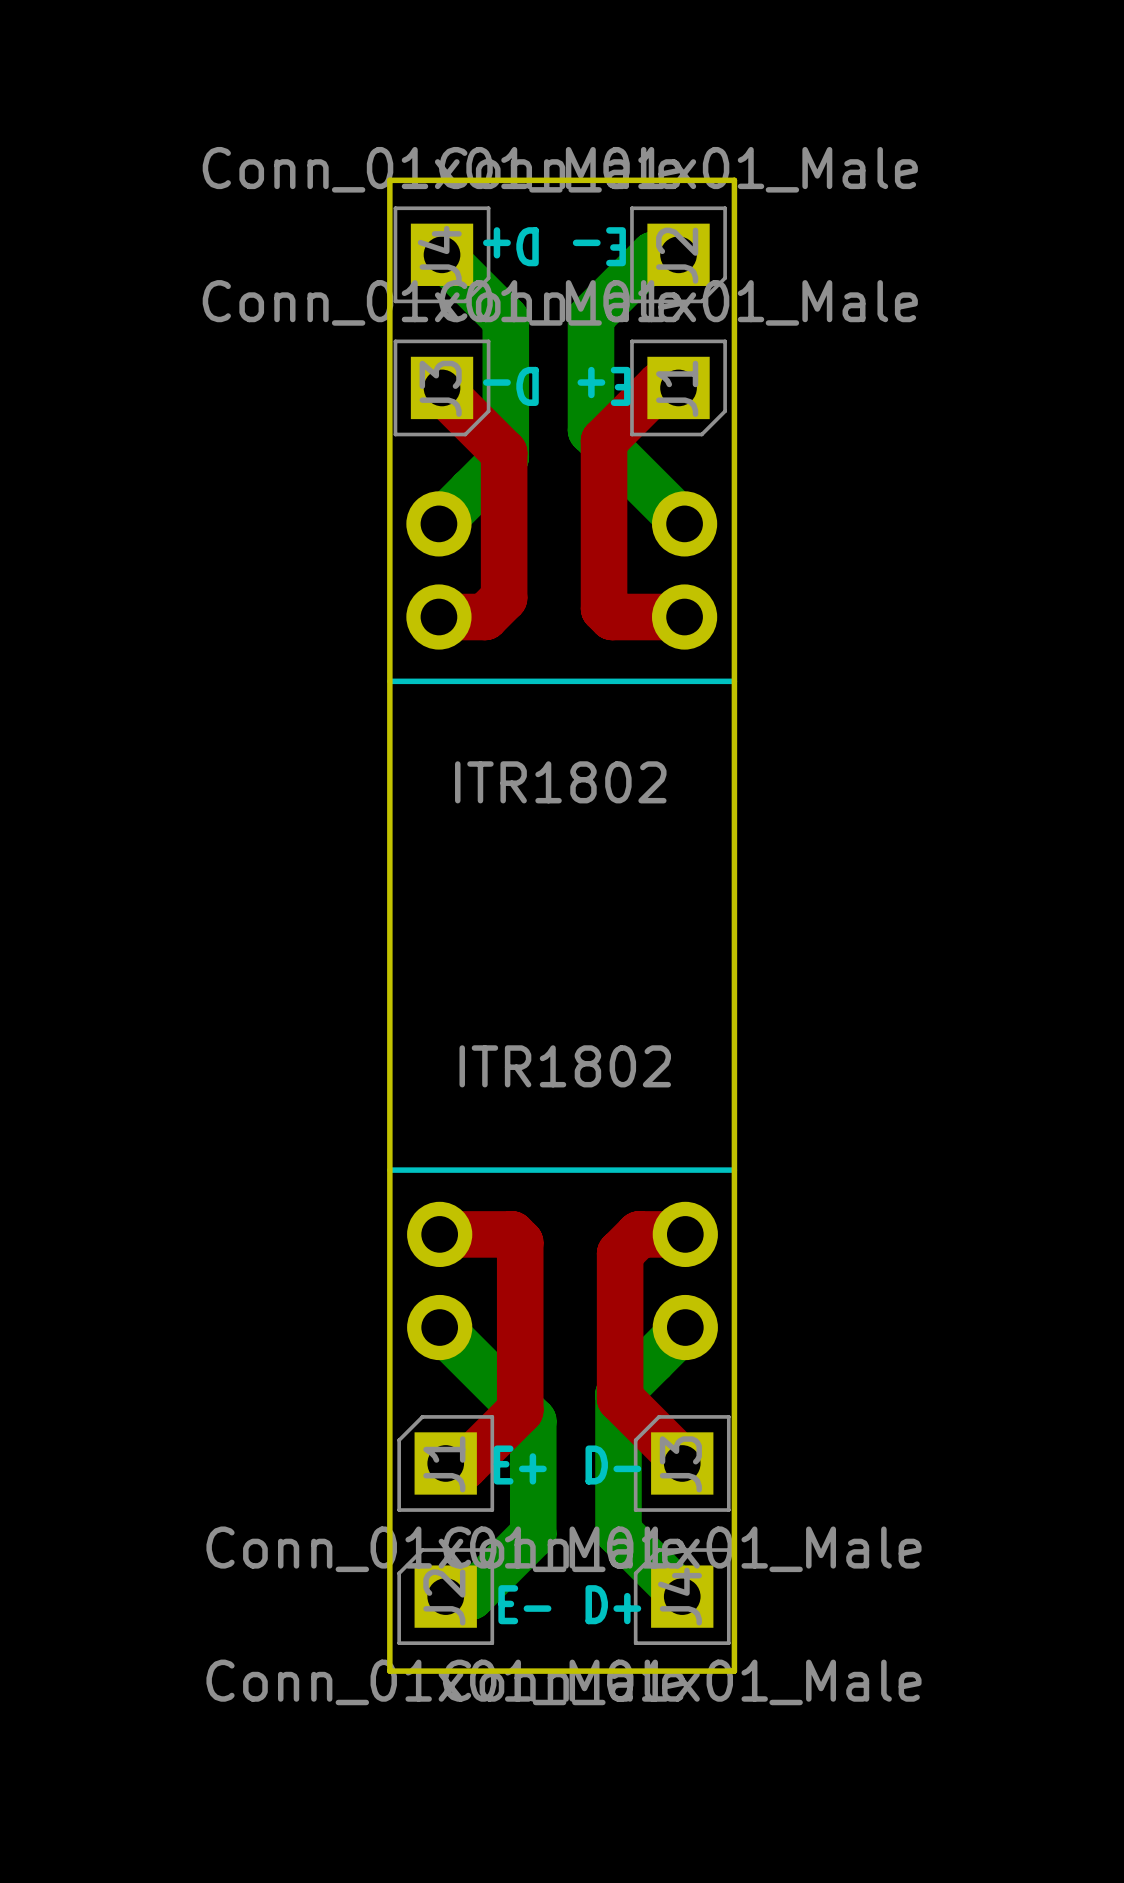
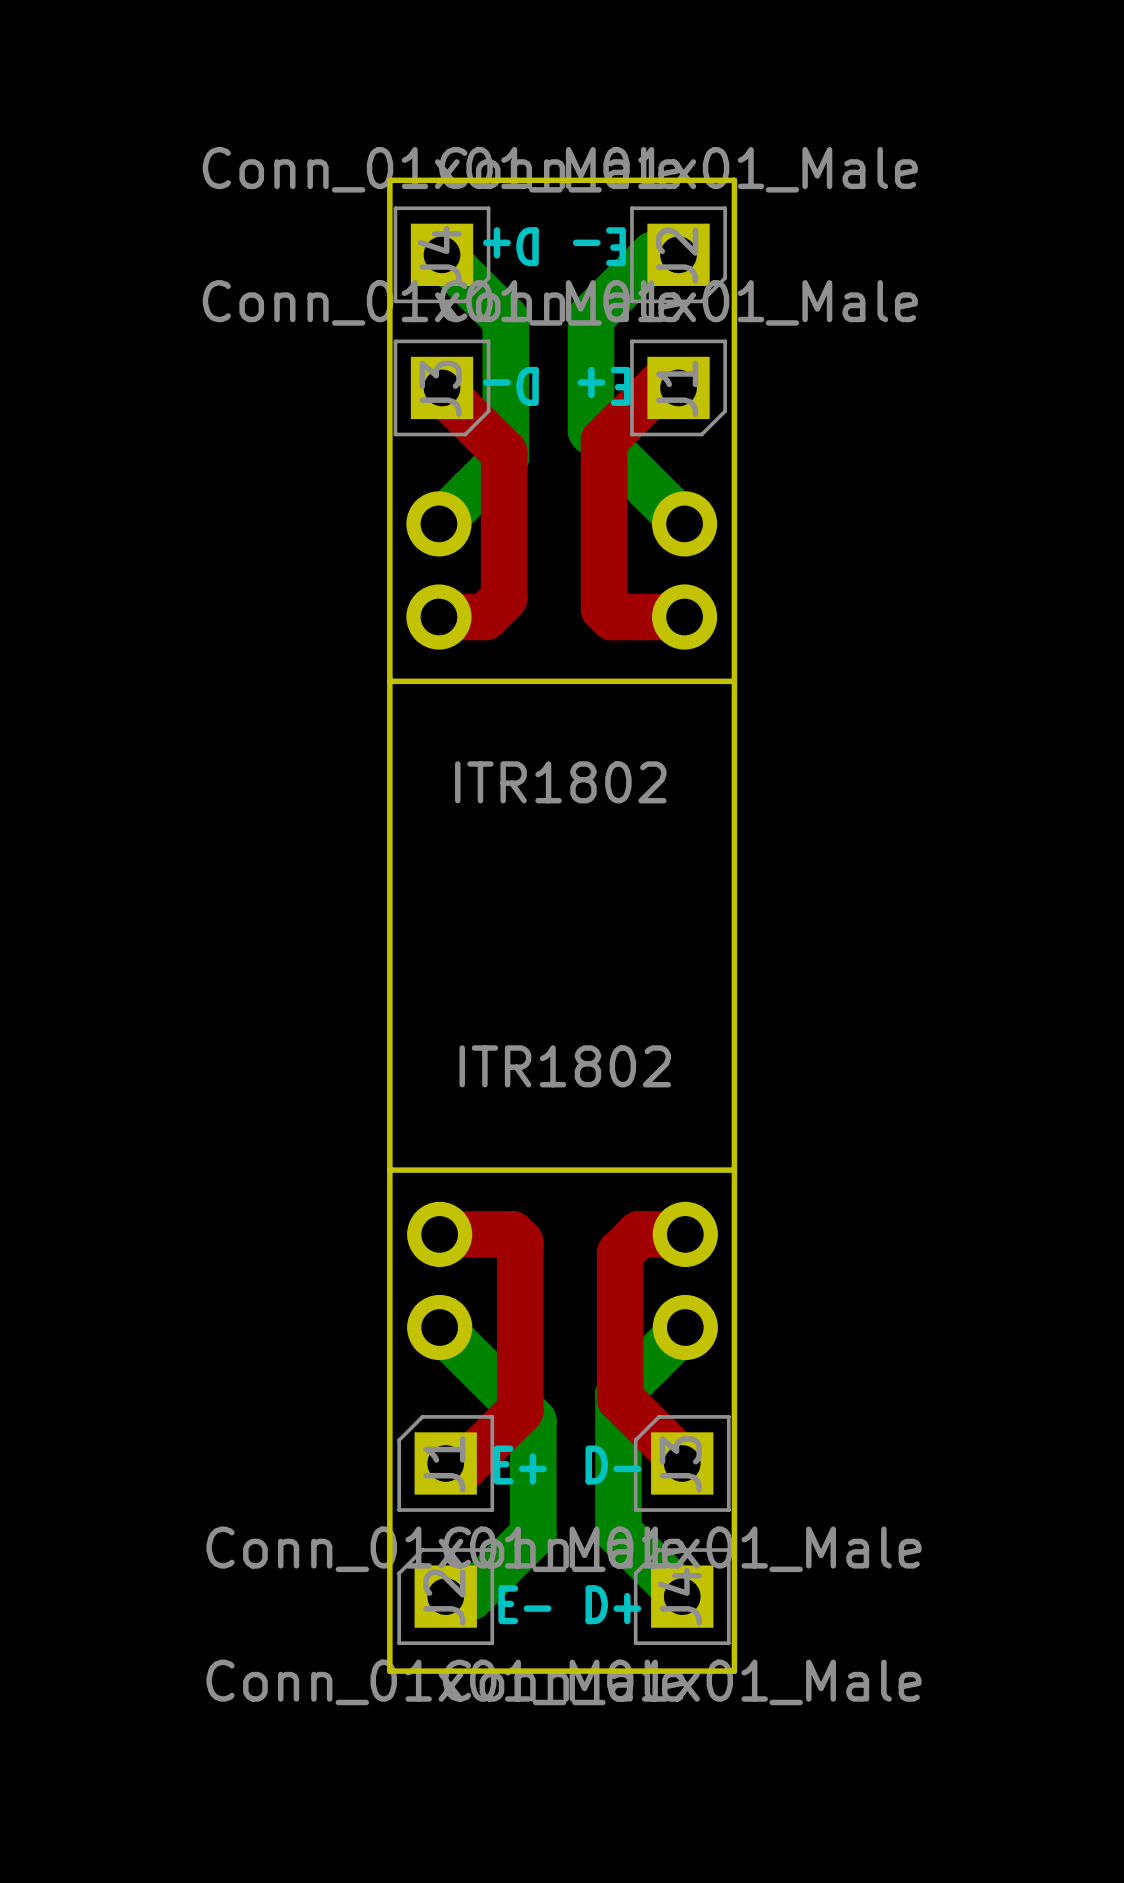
line: (389, 681) (734, 681) -> none
board edge: none -> (389, 681) (734, 681)
line: (389, 1170) (734, 1170) -> none
board edge: none -> (389, 1170) (734, 1170)

